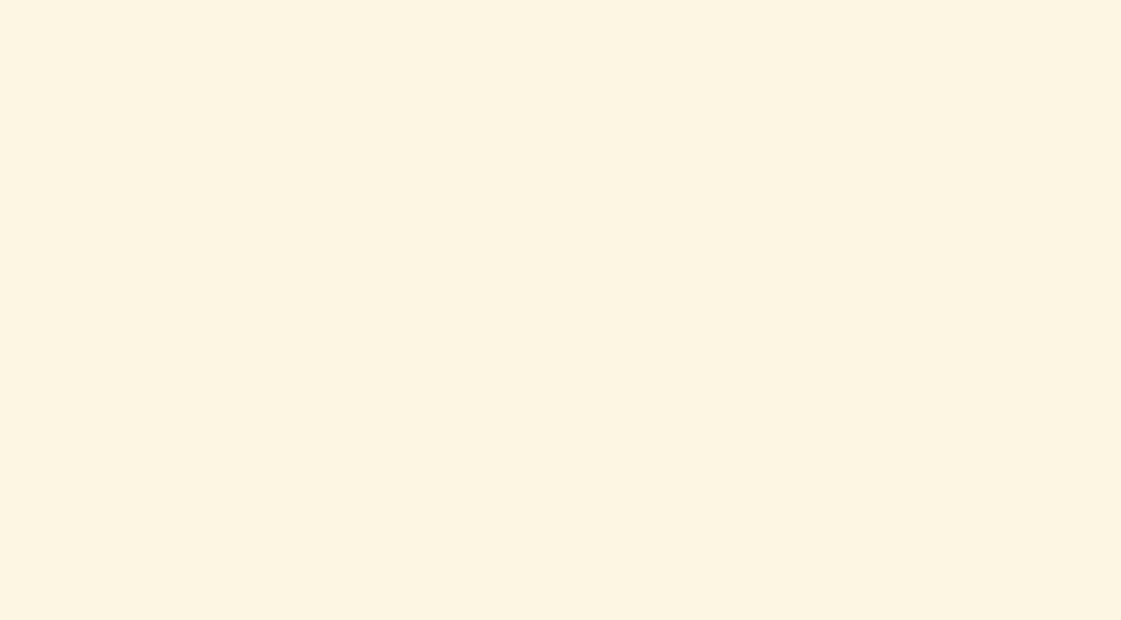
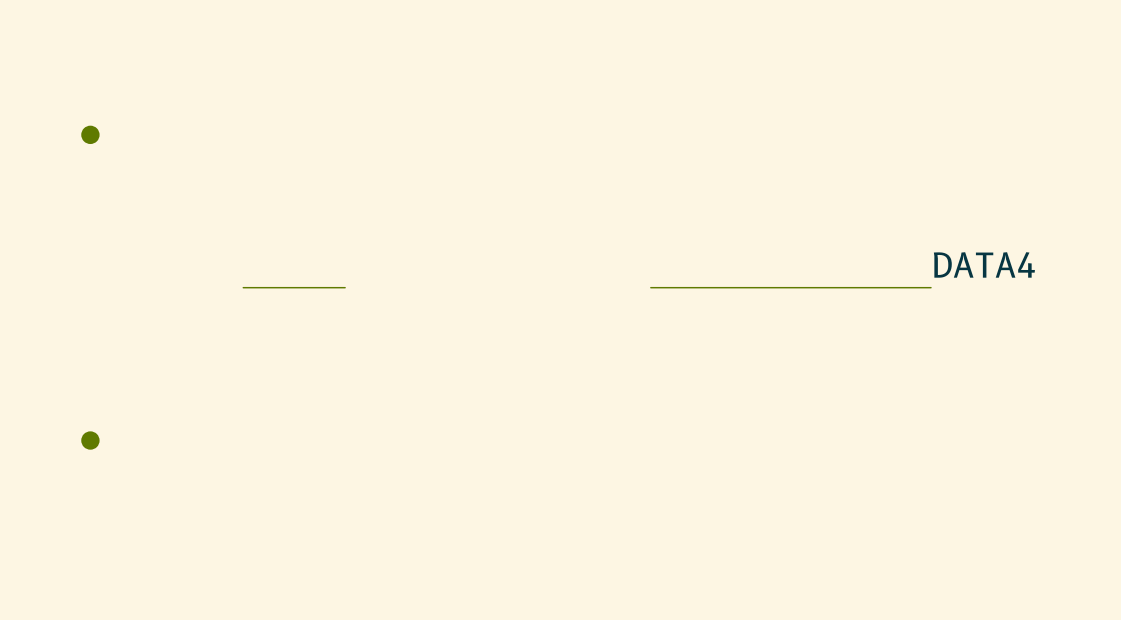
junction: none -> (90, 134)
label: none -> DATA4 (984, 264)
wire: none -> (243, 287) (345, 287)
wire: none -> (650, 287) (931, 287)
junction: none -> (90, 440)

